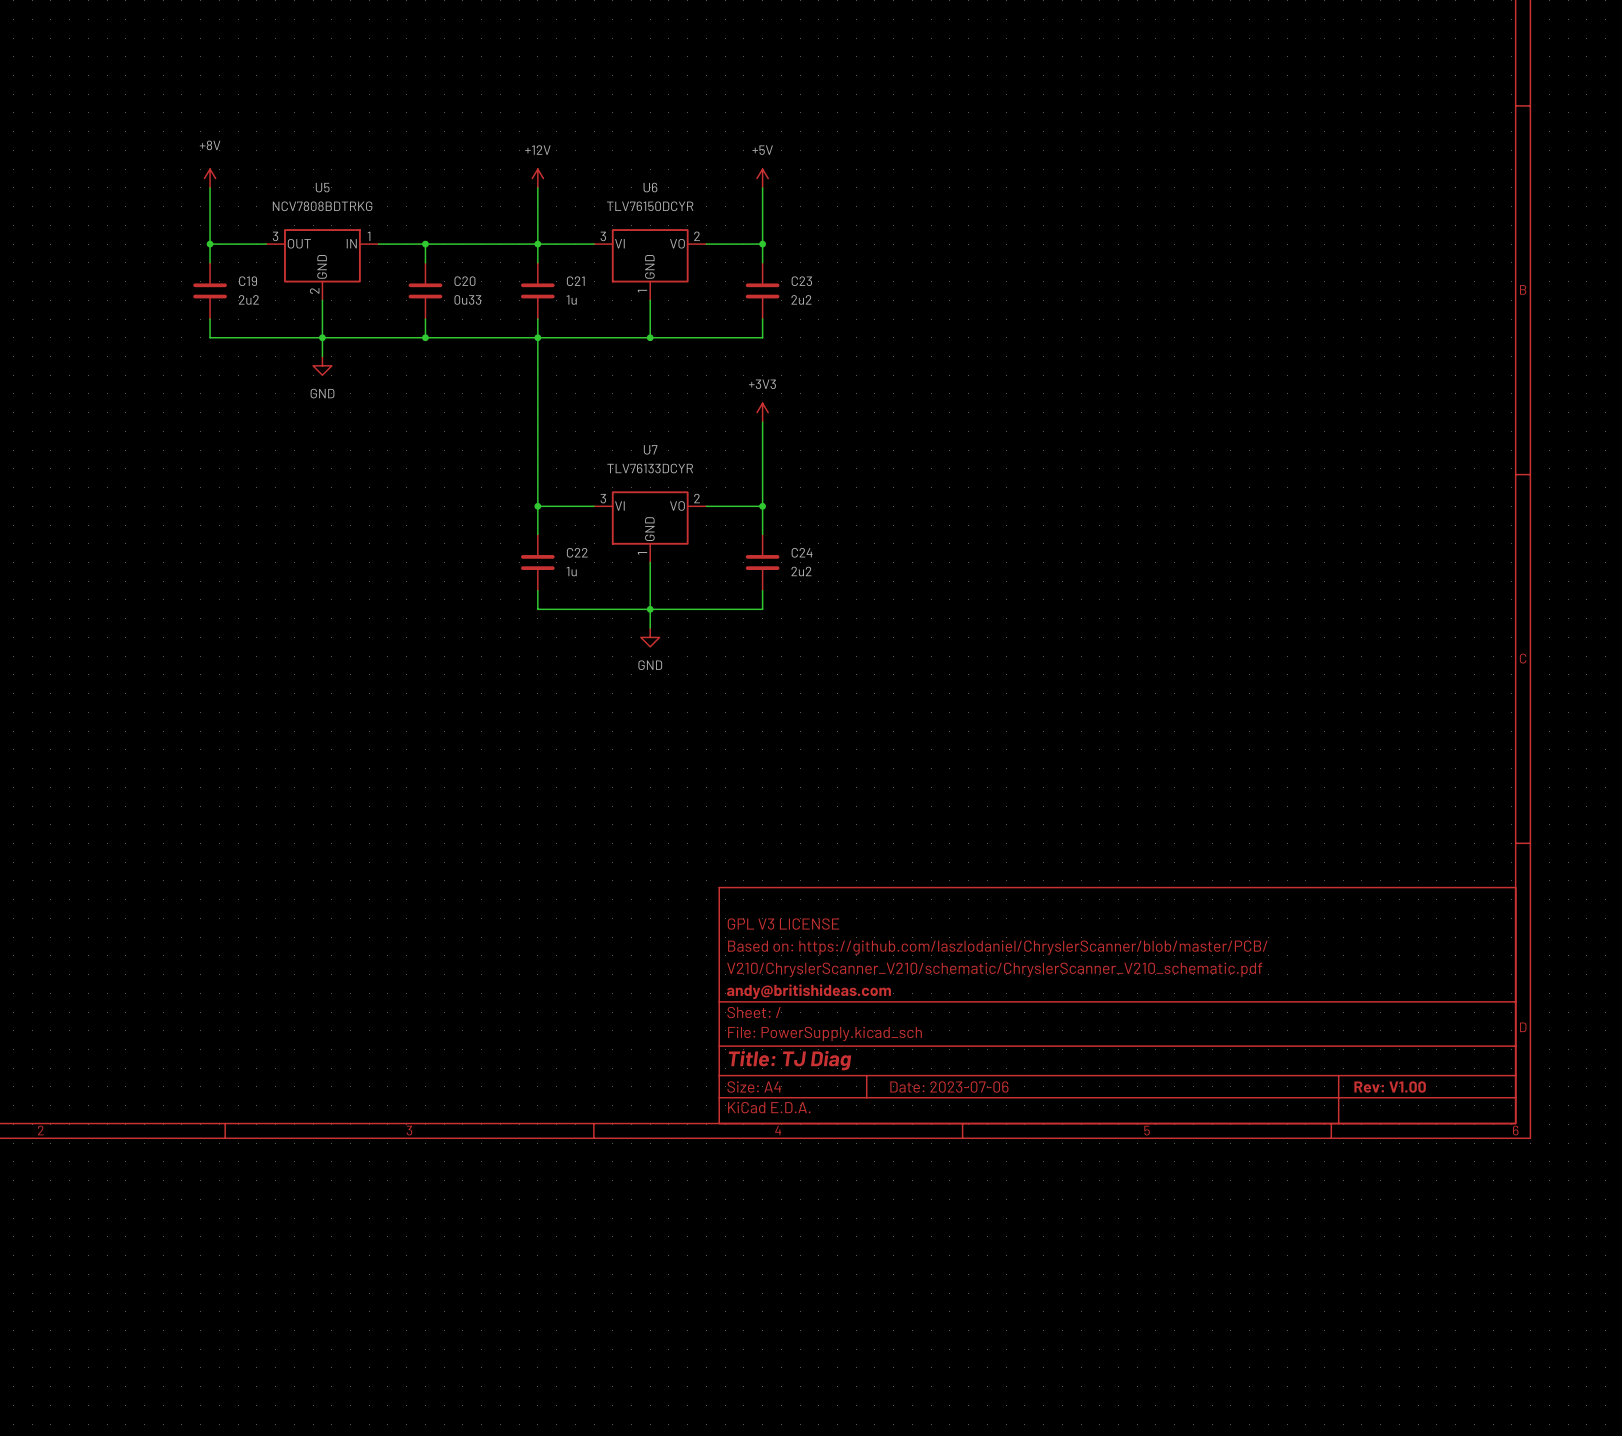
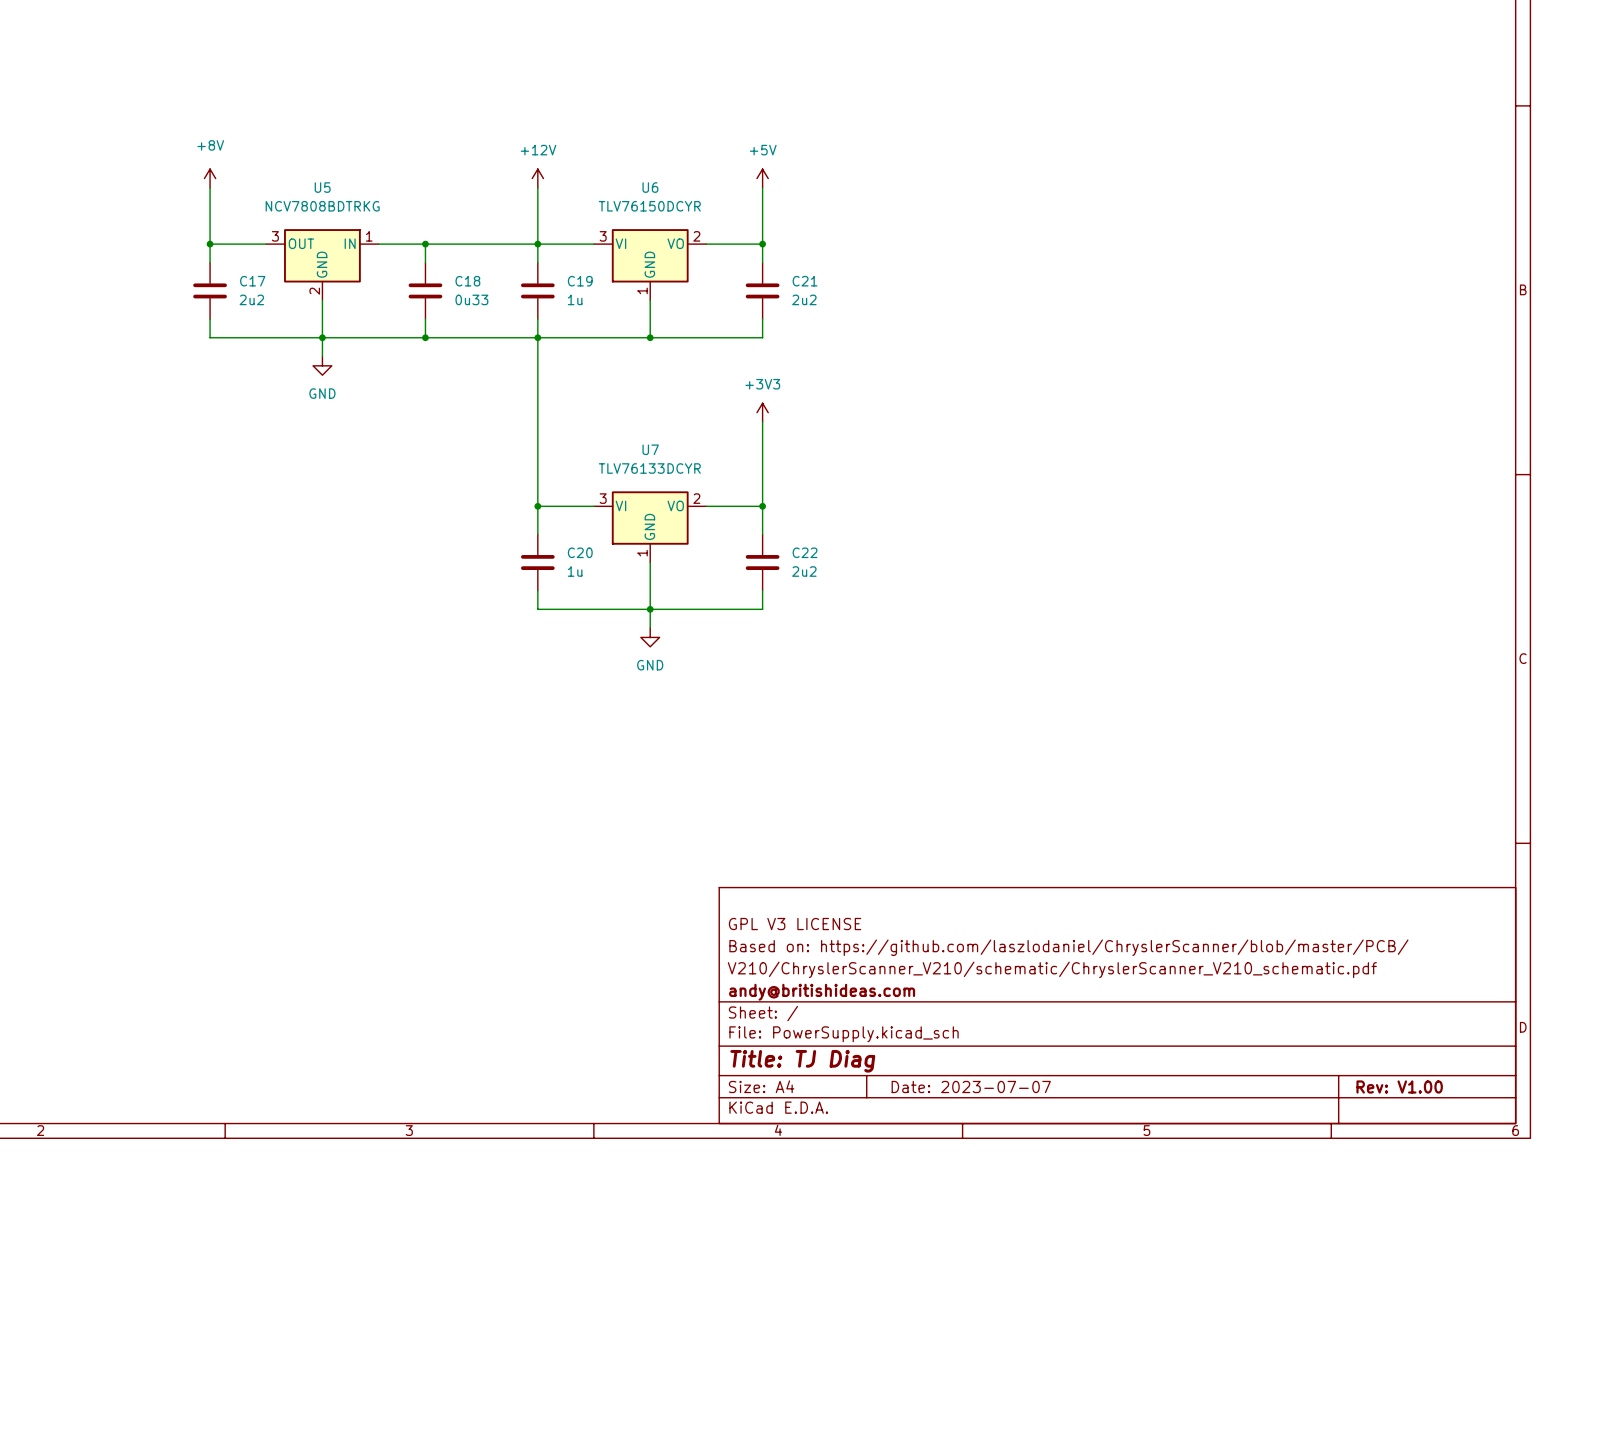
C19 name: C19 (248, 281) -> C17 (252, 281)
C20 name: C20 (464, 281) -> C18 (467, 281)
C21 name: C21 (575, 281) -> C19 (580, 281)
C23 name: C23 (801, 281) -> C21 (805, 281)
C22 name: C22 (577, 552) -> C20 (580, 552)
C24 name: C24 (802, 552) -> C22 (805, 552)
title block: Date: 2023-07-06 (949, 1087) -> Date: 2023-07-07 (971, 1086)

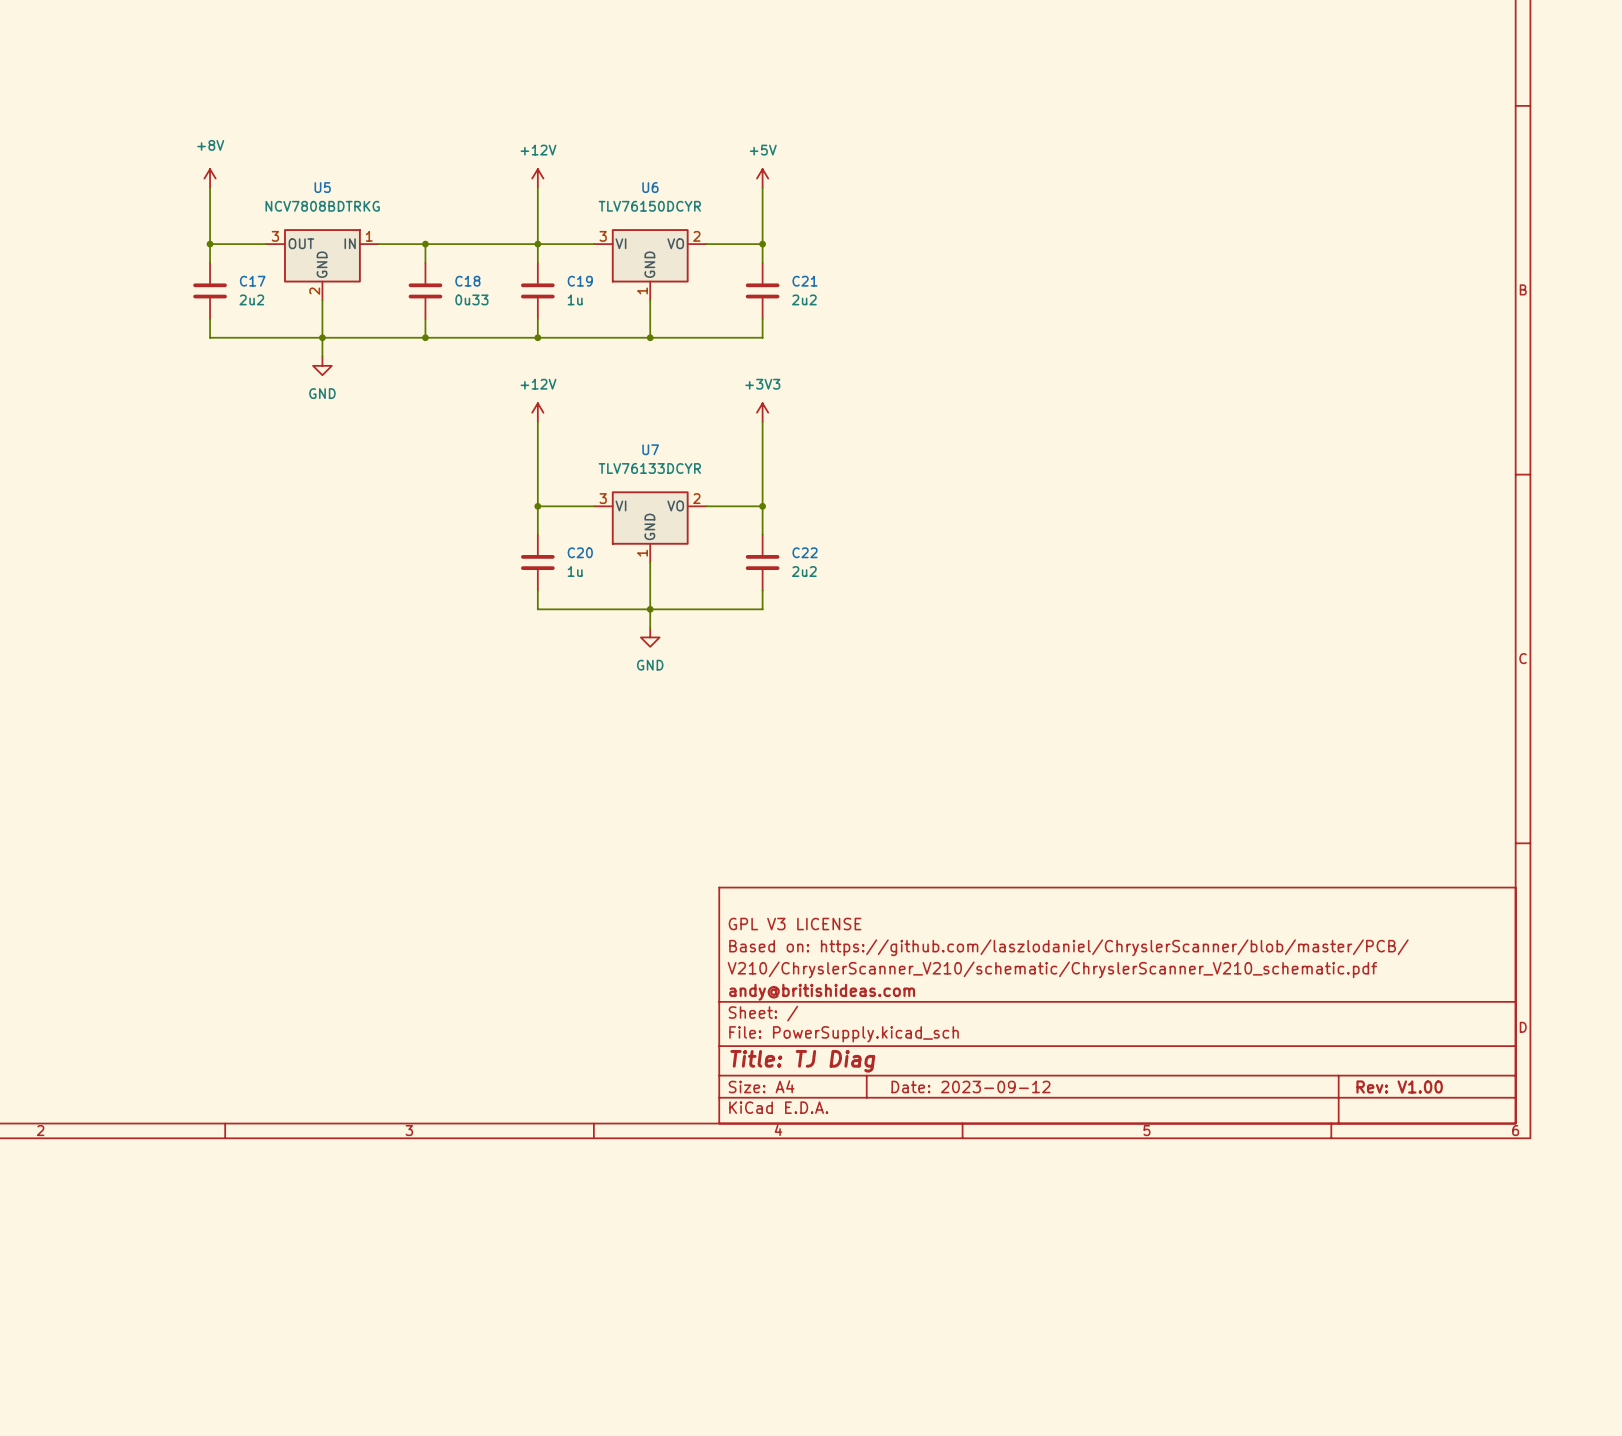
wire: (537, 337) (537, 422) -> none
power symbol: none -> +12V (537, 412)
title block: Date: 2023-07-07 (971, 1086) -> Date: 2023-09-12 (970, 1086)

